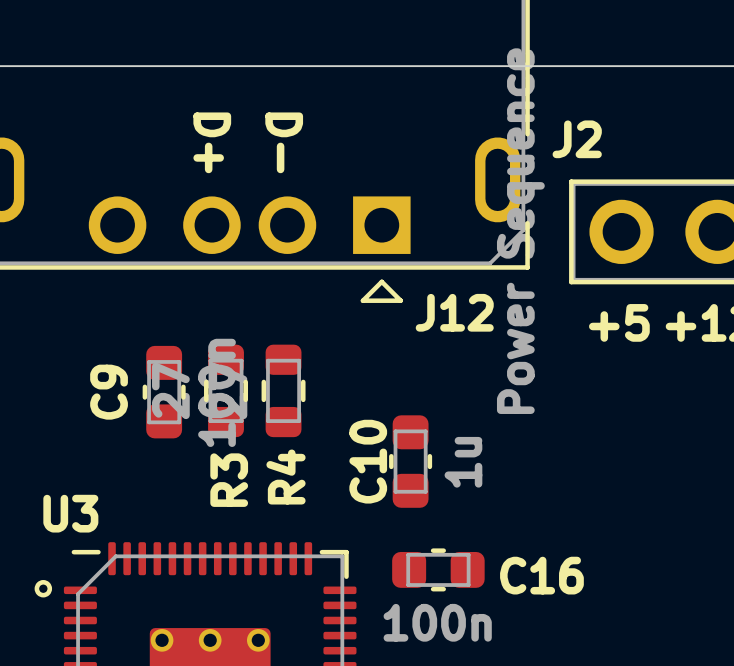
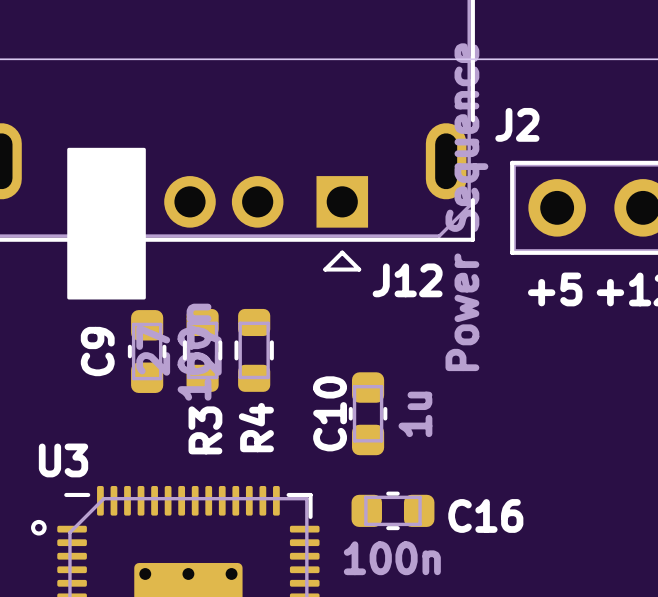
text: D+ (212, 142) -> none
text: D- (284, 142) -> none
drawing: none -> [67, 147, 146, 300]

